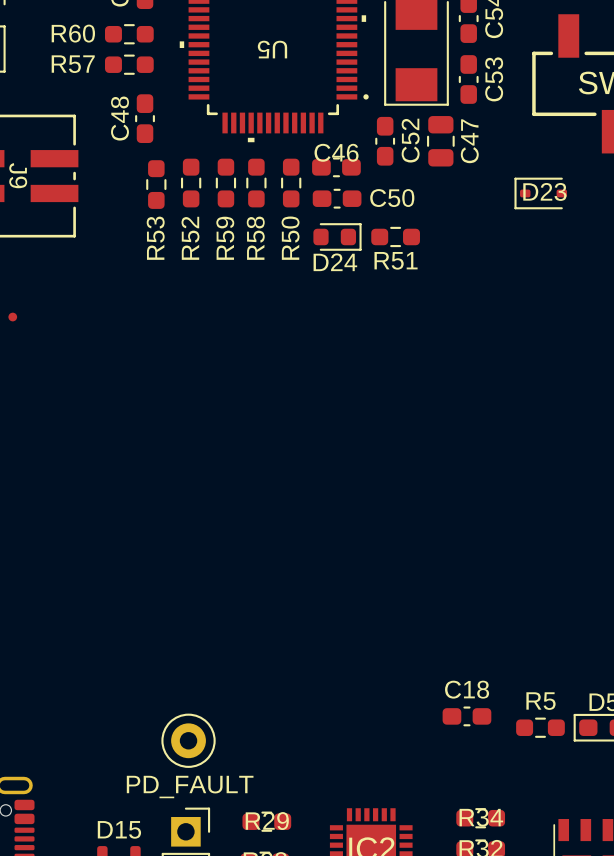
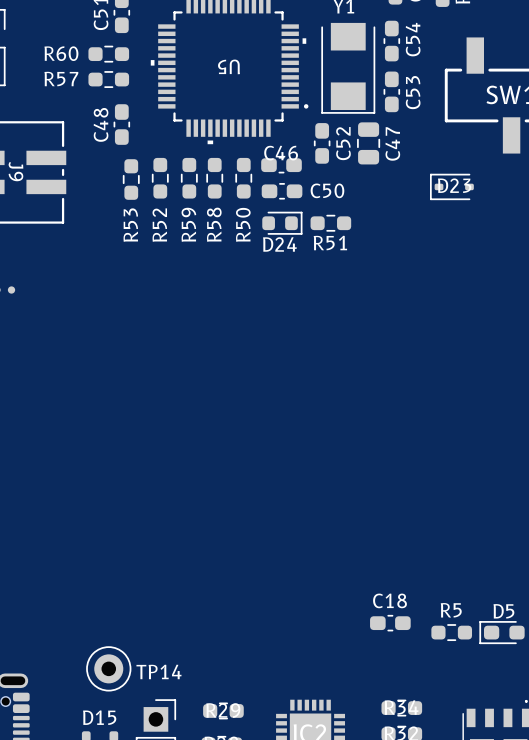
part: PD_FAULT (188, 740) -> none
TP14: none -> (108, 668)

